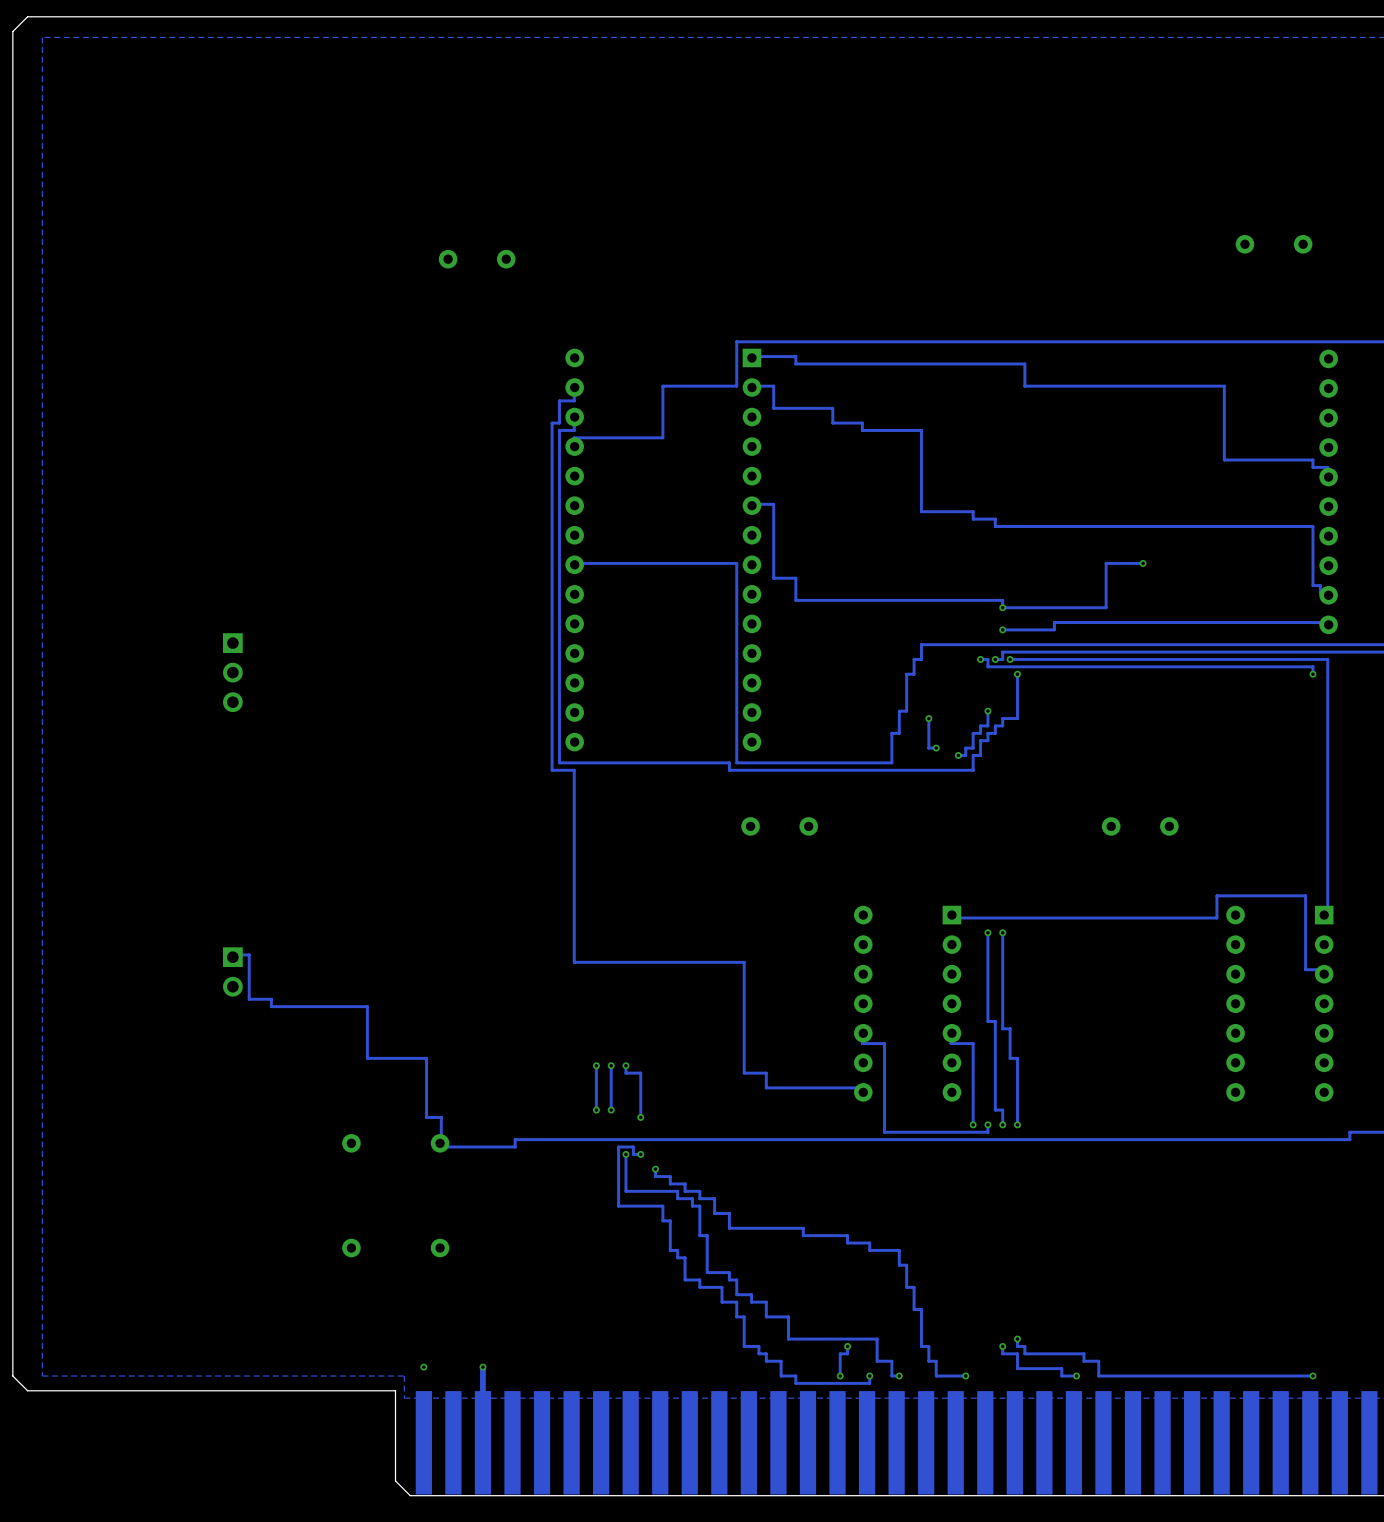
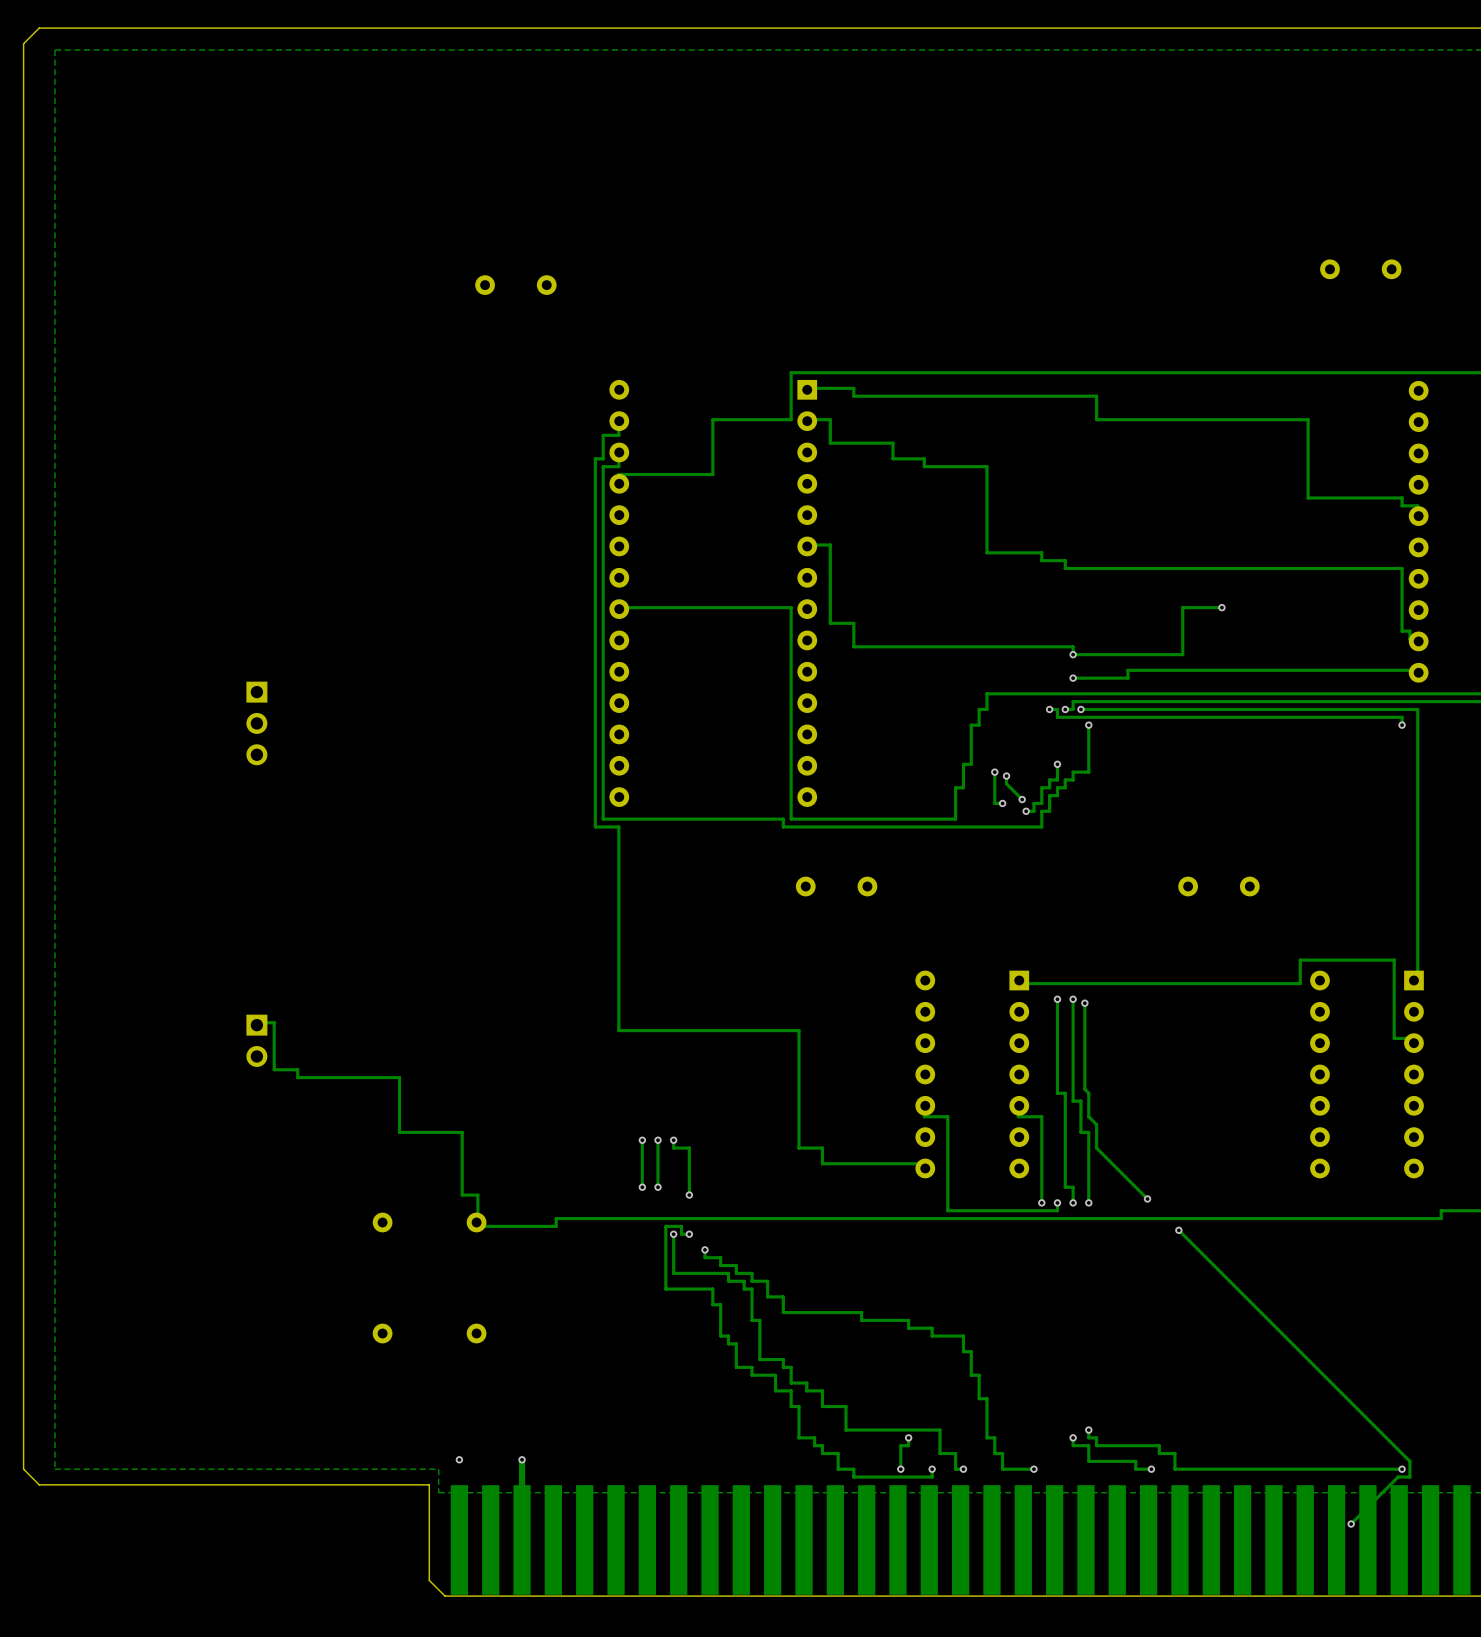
track: none -> (1006, 776) (1006, 783) (1022, 799)
via: none -> (1006, 776)
via: none -> (1022, 799)
track: none -> (1084, 1003) (1084, 1089) (1088, 1093) (1088, 1116) (1096, 1124) (1096, 1148) (1147, 1198)
via: none -> (1084, 1003)
via: none -> (1147, 1198)
track: none -> (1178, 1230) (1409, 1461) (1409, 1477) (1398, 1477) (1351, 1524)
via: none -> (1178, 1230)
via: none -> (1351, 1524)

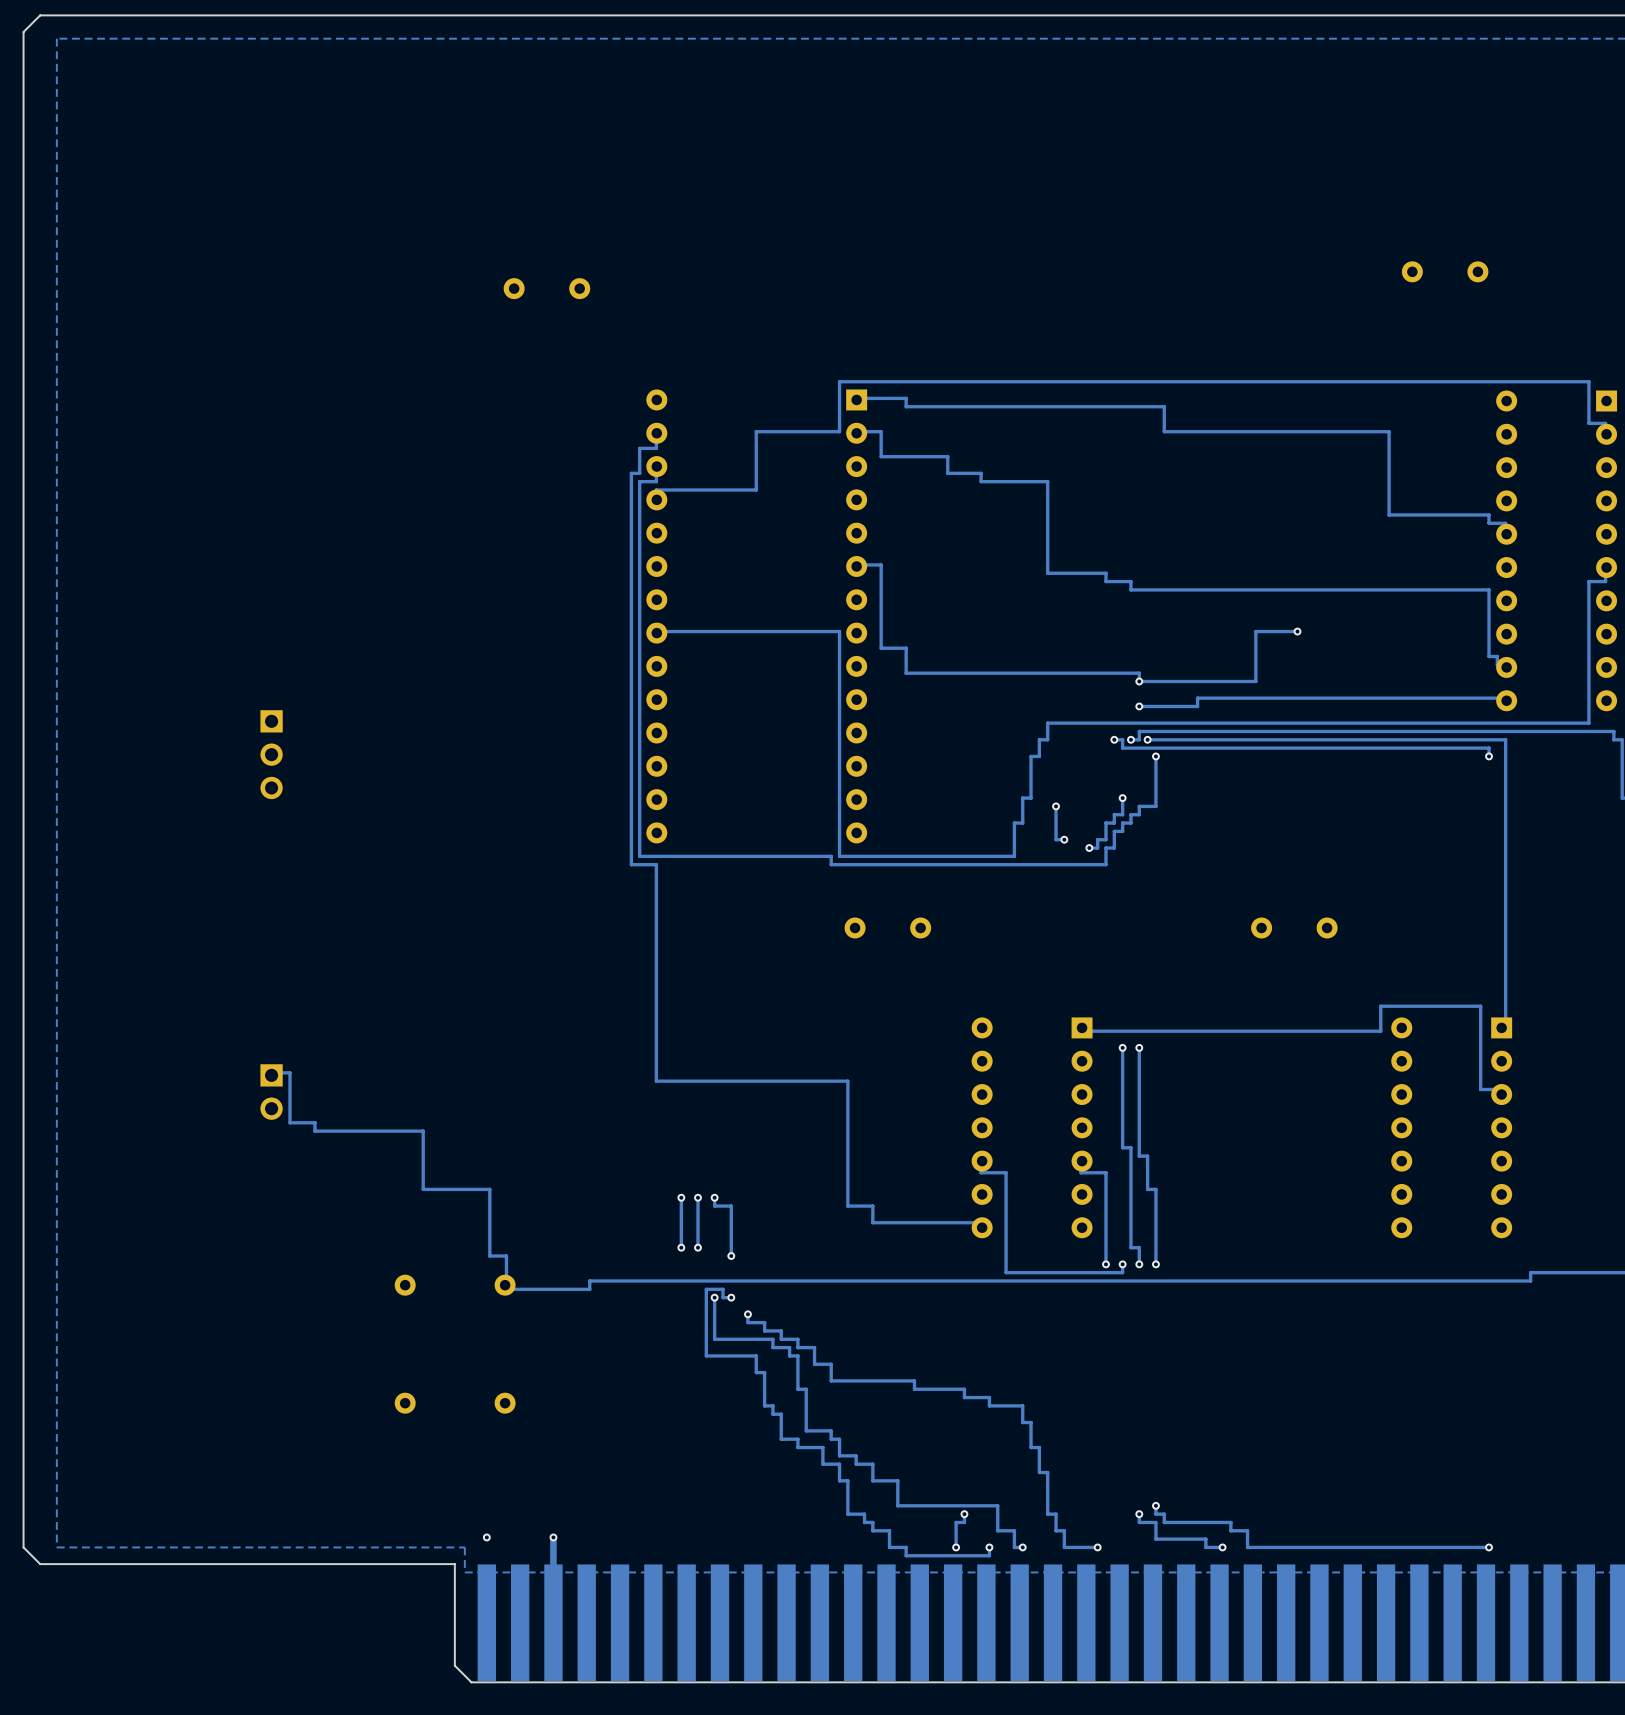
track: (1006, 776) (1006, 783) (1022, 799) -> none
via: (1006, 776) -> none
via: (1022, 799) -> none
track: (1084, 1003) (1084, 1089) (1088, 1093) (1088, 1116) (1096, 1124) (1096, 1148) (1147, 1198) -> none
via: (1084, 1003) -> none
via: (1147, 1198) -> none
track: (1178, 1230) (1409, 1461) (1409, 1477) (1398, 1477) (1351, 1524) -> none
via: (1178, 1230) -> none
via: (1351, 1524) -> none

